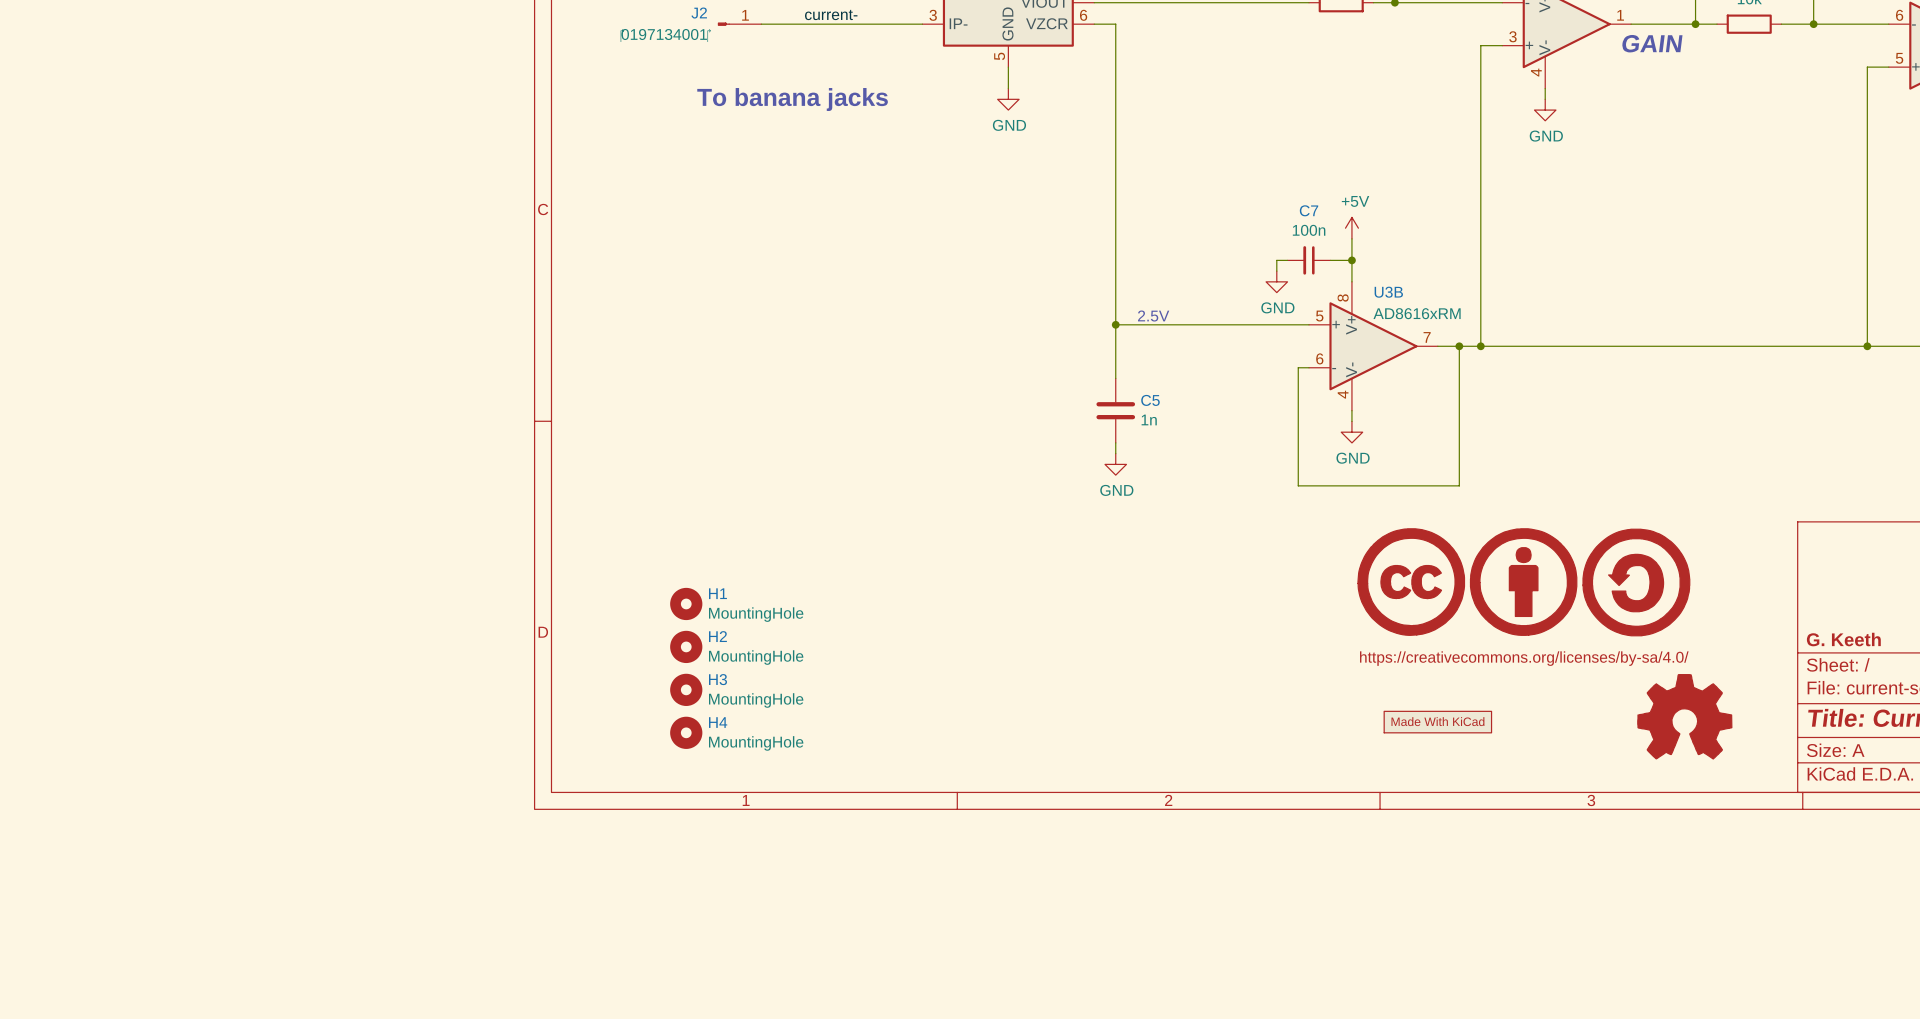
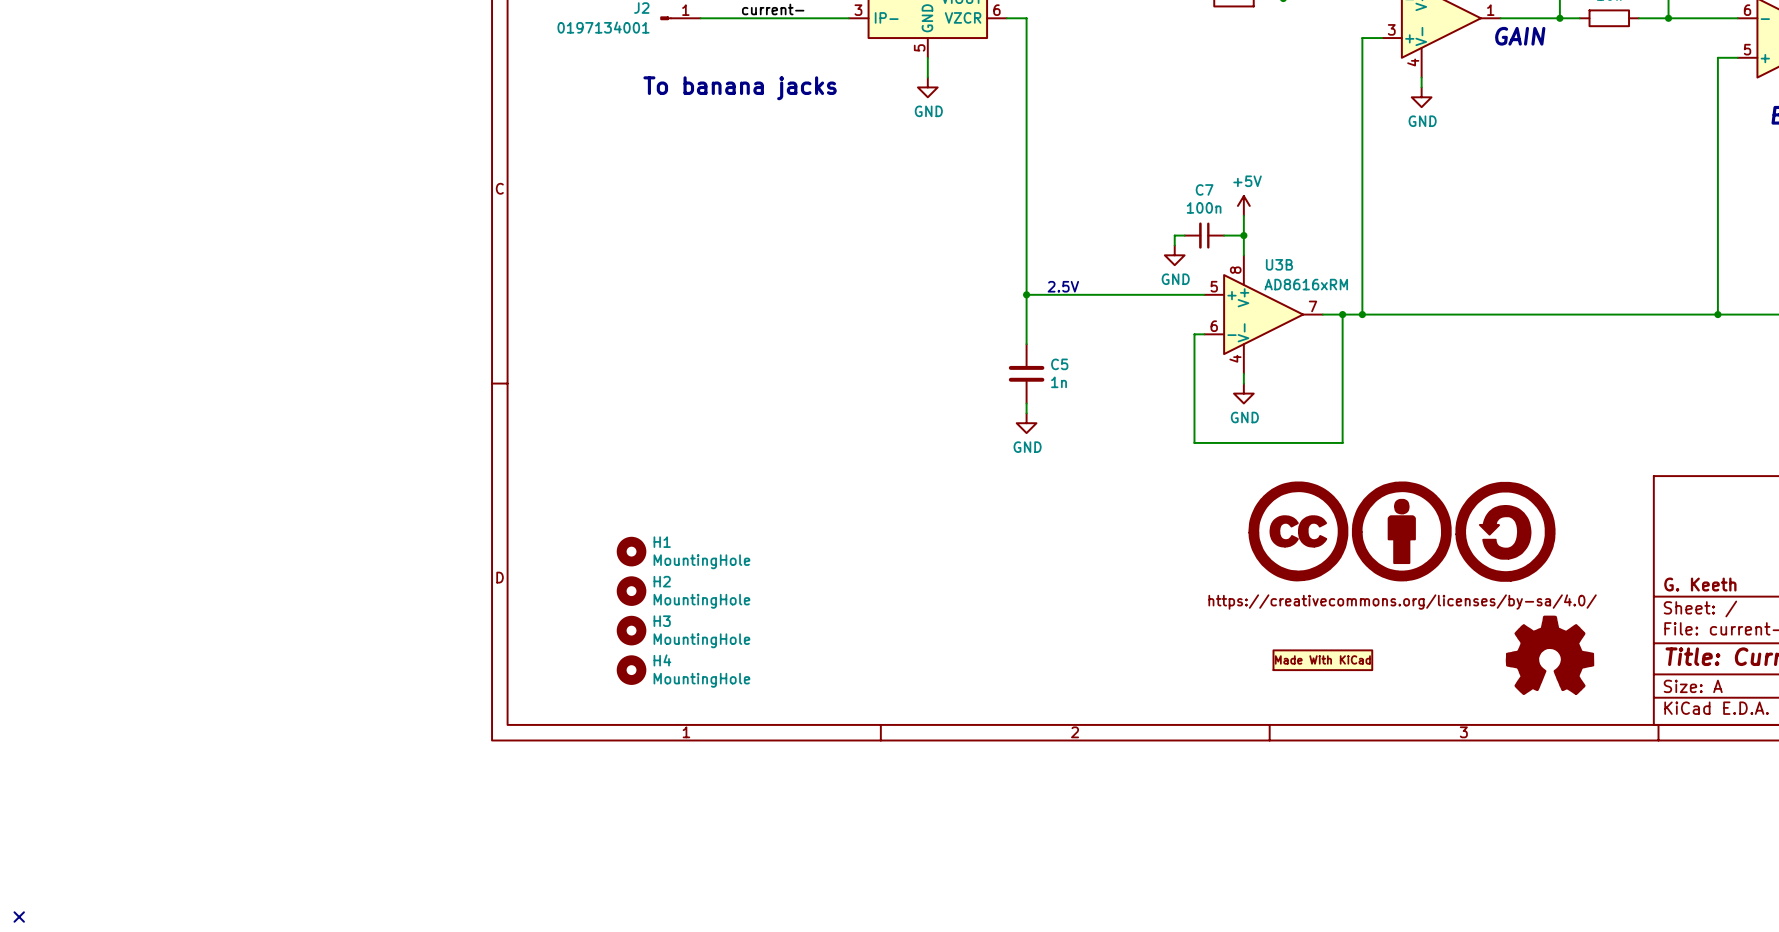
no-connect mark: none -> (19, 917)

